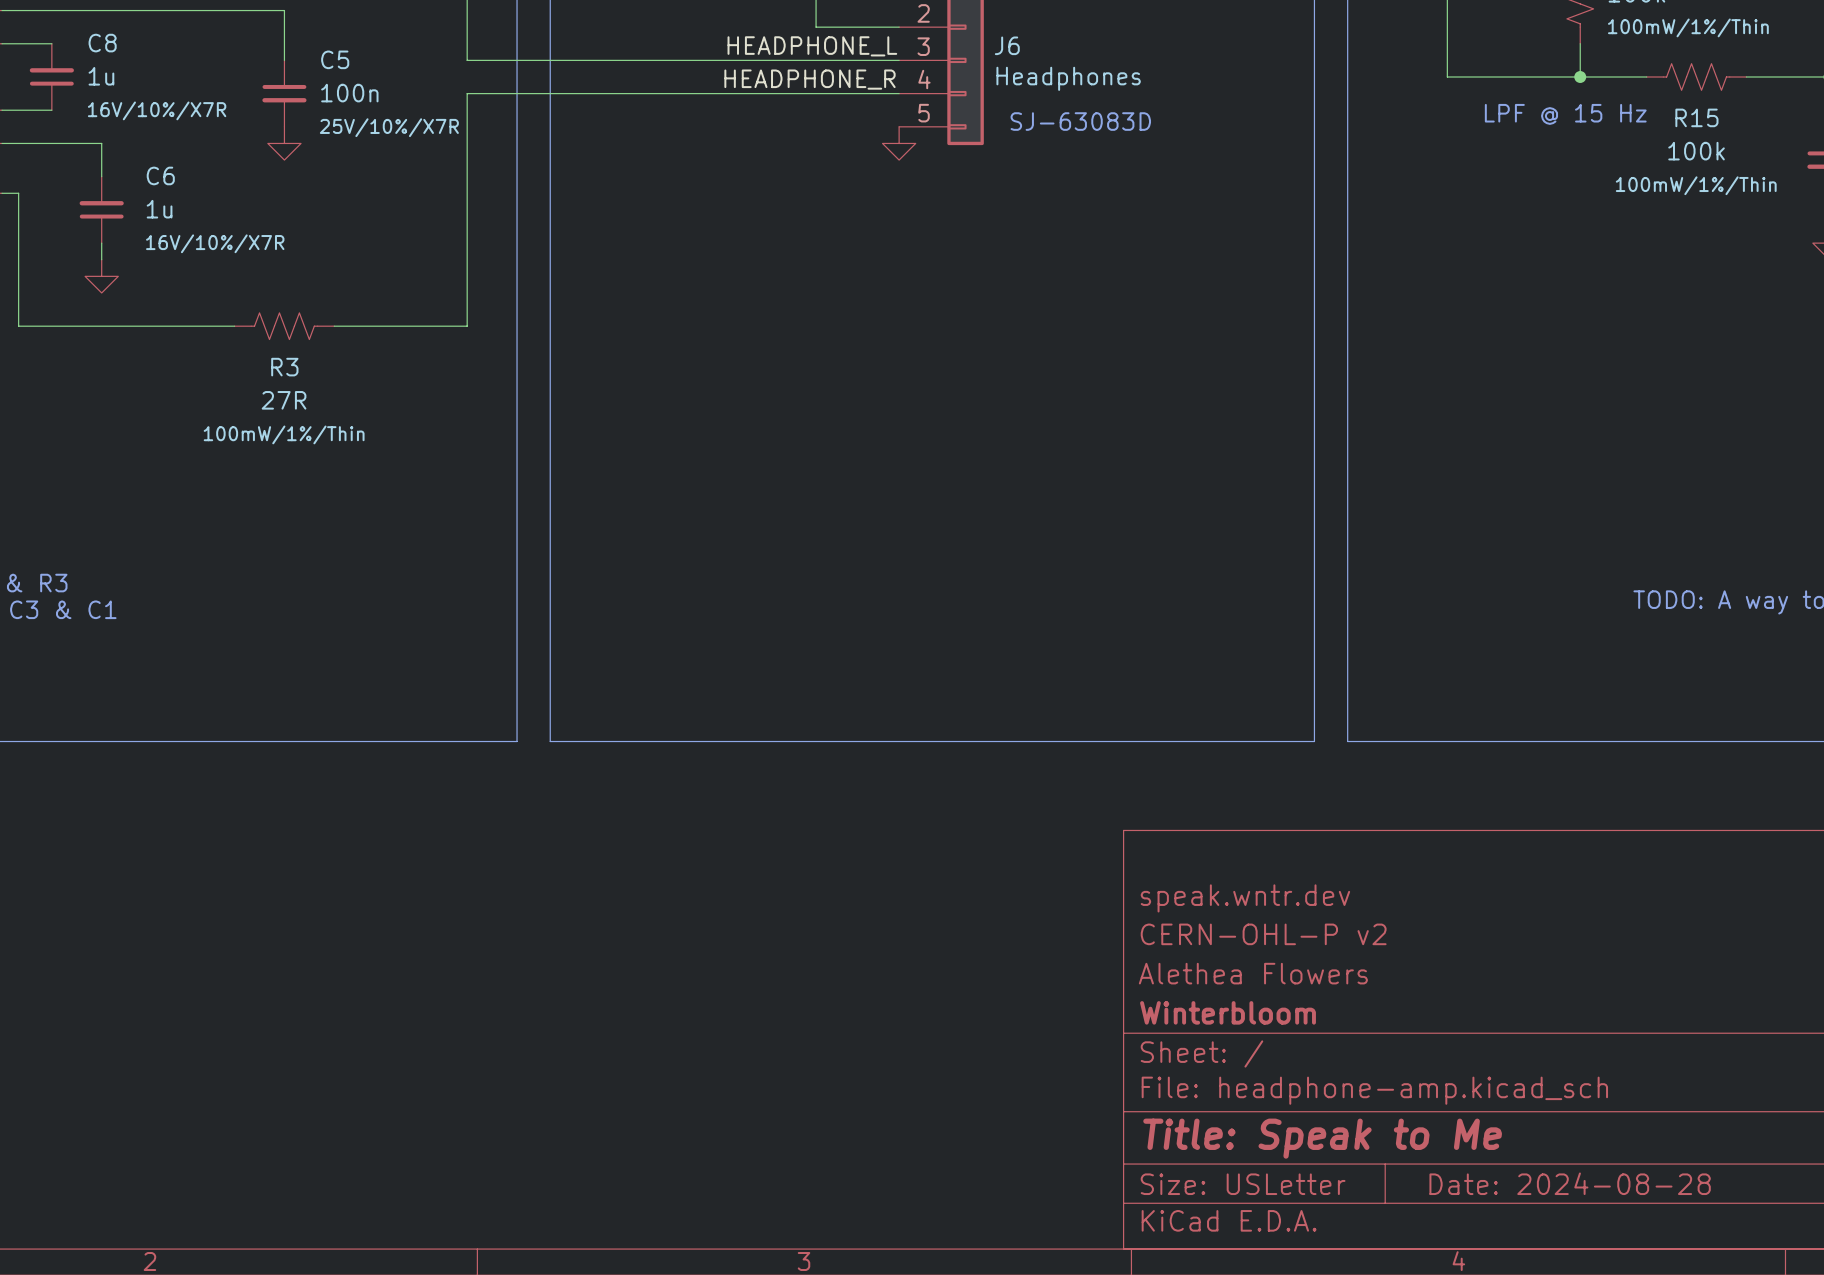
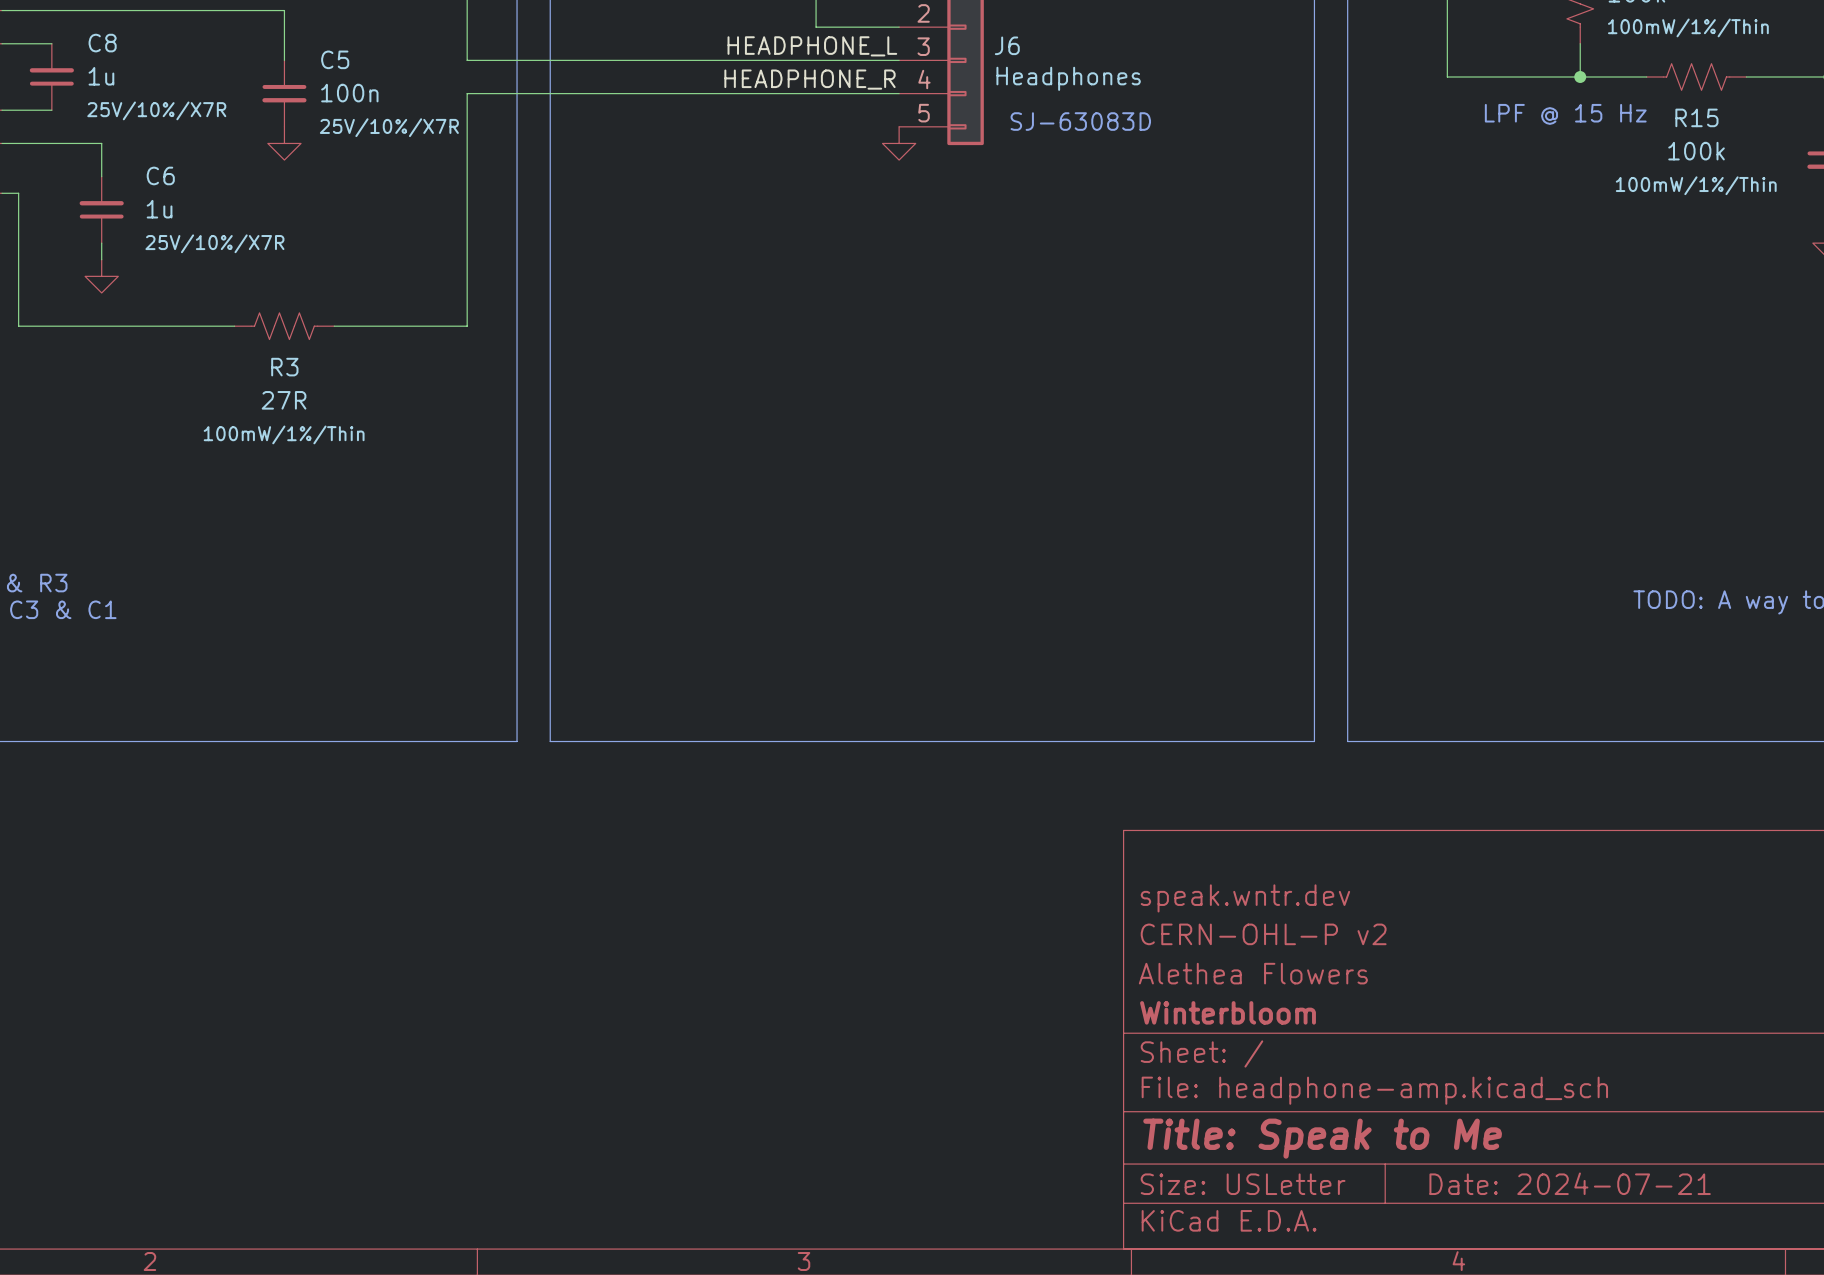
C8 text: 16V/10%/X7R (157, 110) -> 25V/10%/X7R (156, 110)
C6 text: 16V/10%/X7R (215, 243) -> 25V/10%/X7R (214, 243)
title block: Date: 2024-08-28 (1570, 1183) -> Date: 2024-07-21 (1570, 1183)

